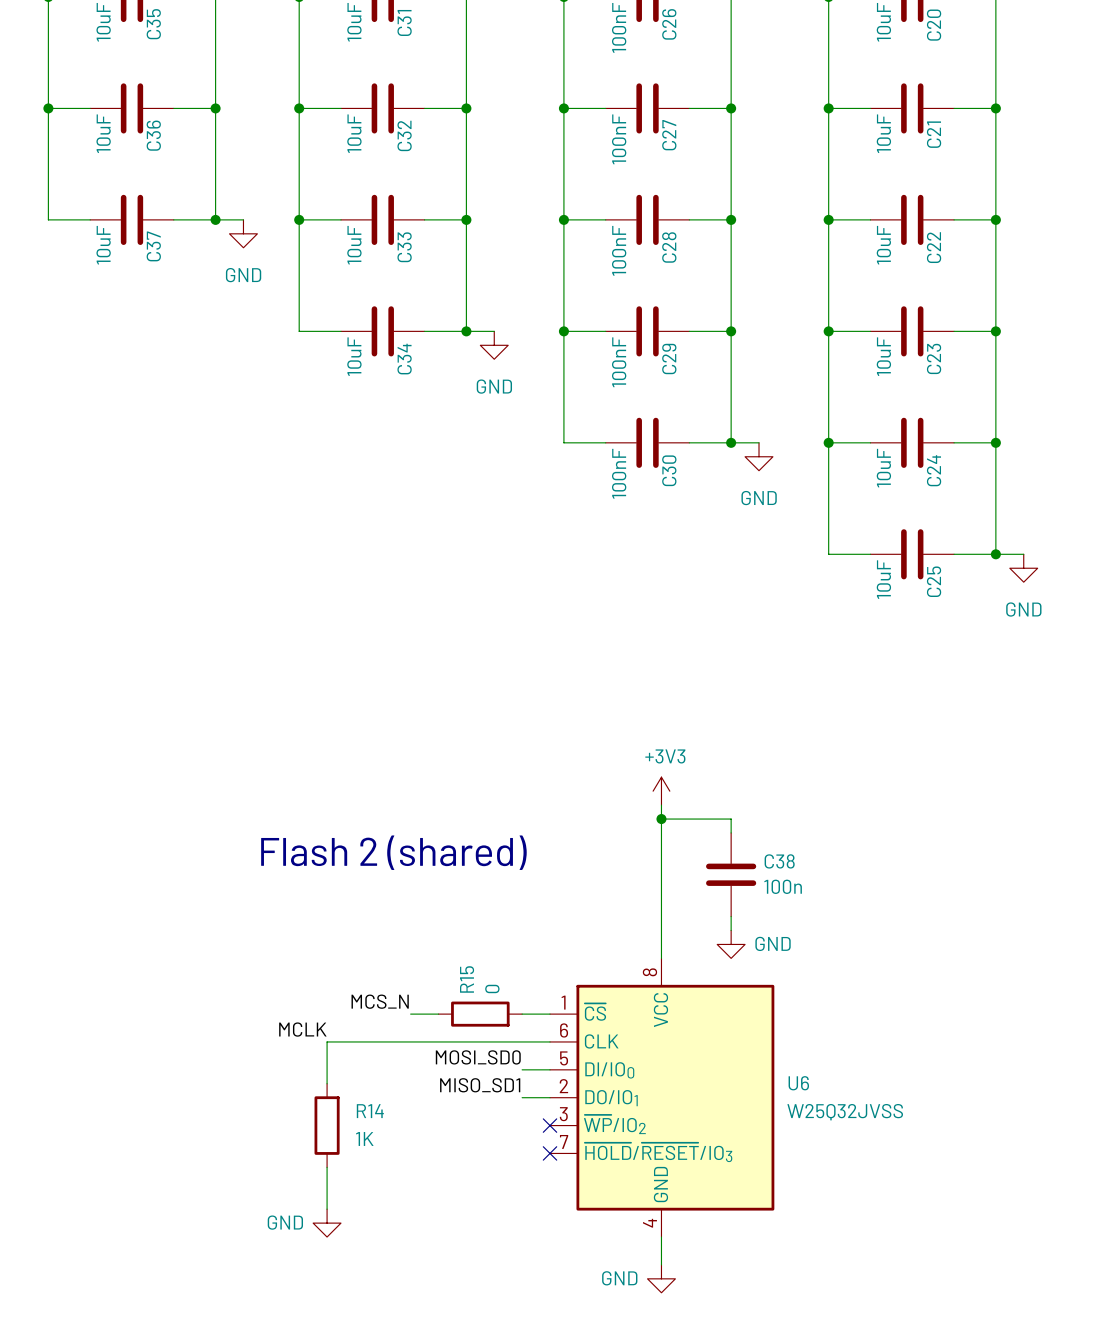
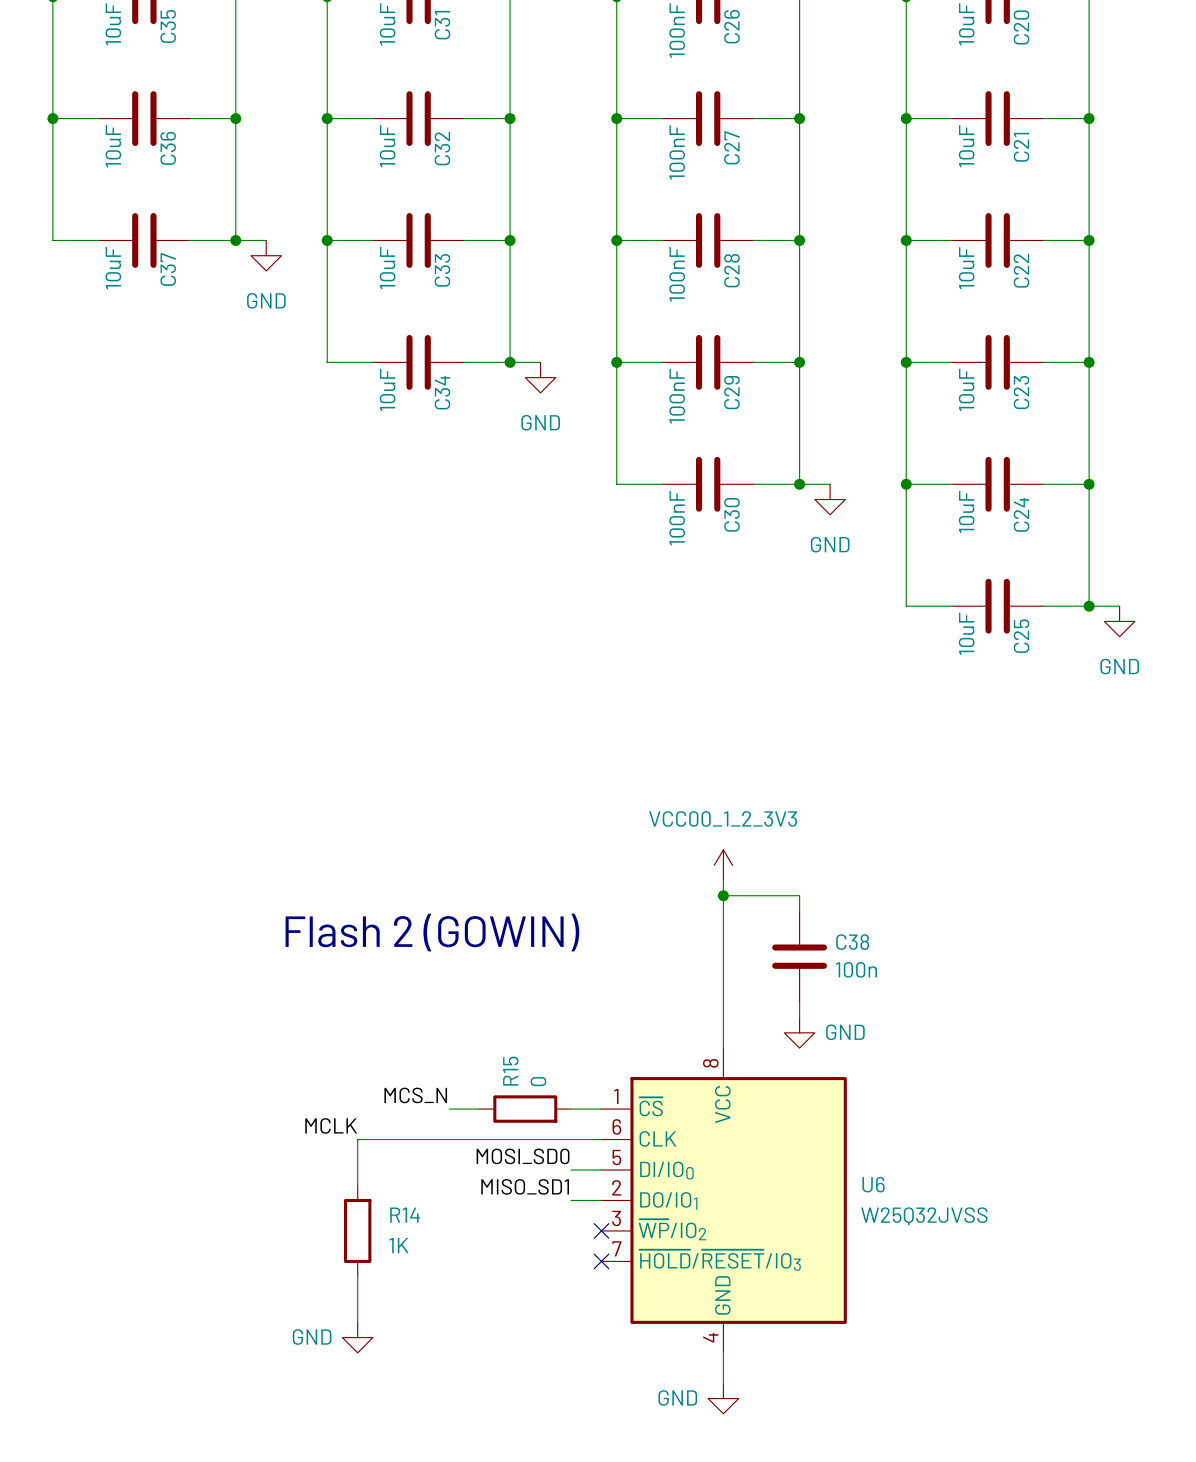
power symbol: +3V3 (661, 791) -> VCC00_1_2_3V3 (723, 865)
text: Flash 2 (shared) (393, 852) -> Flash 2 (GOWIN) (432, 932)

